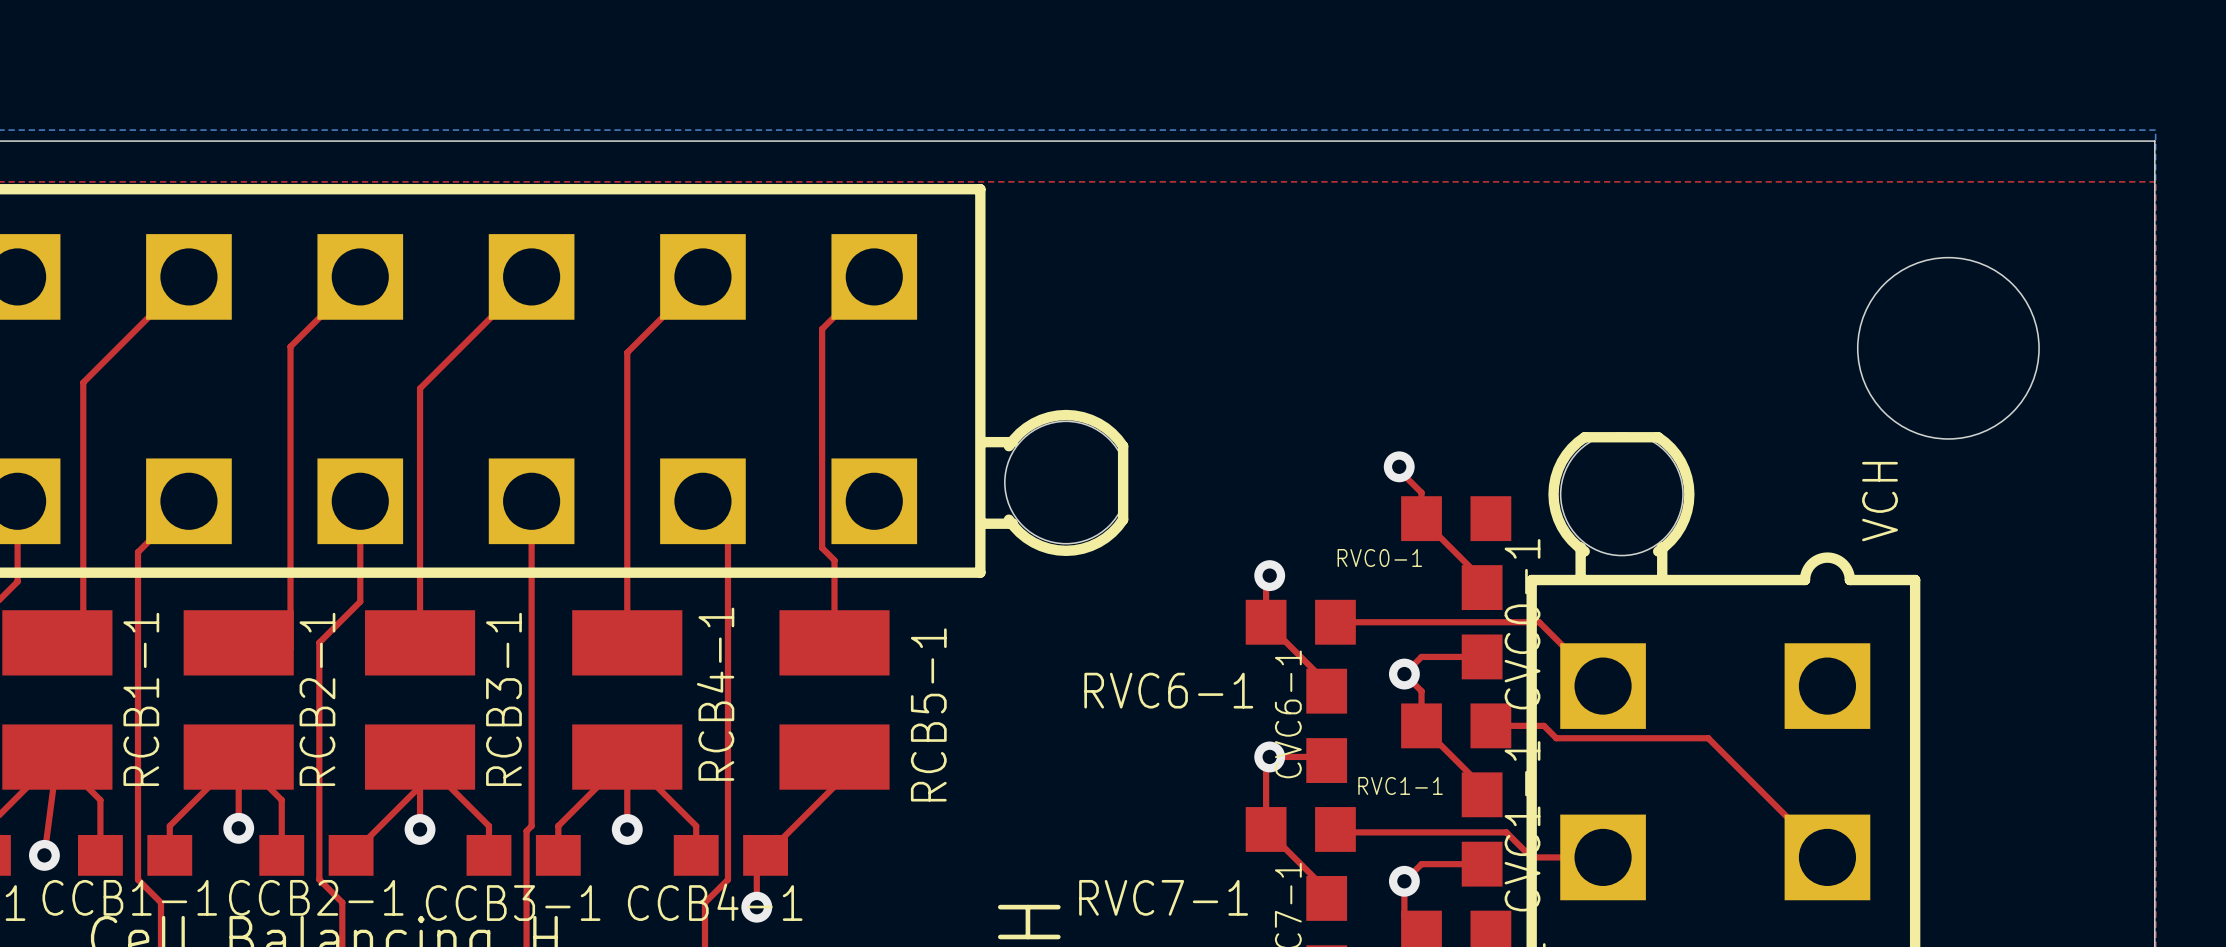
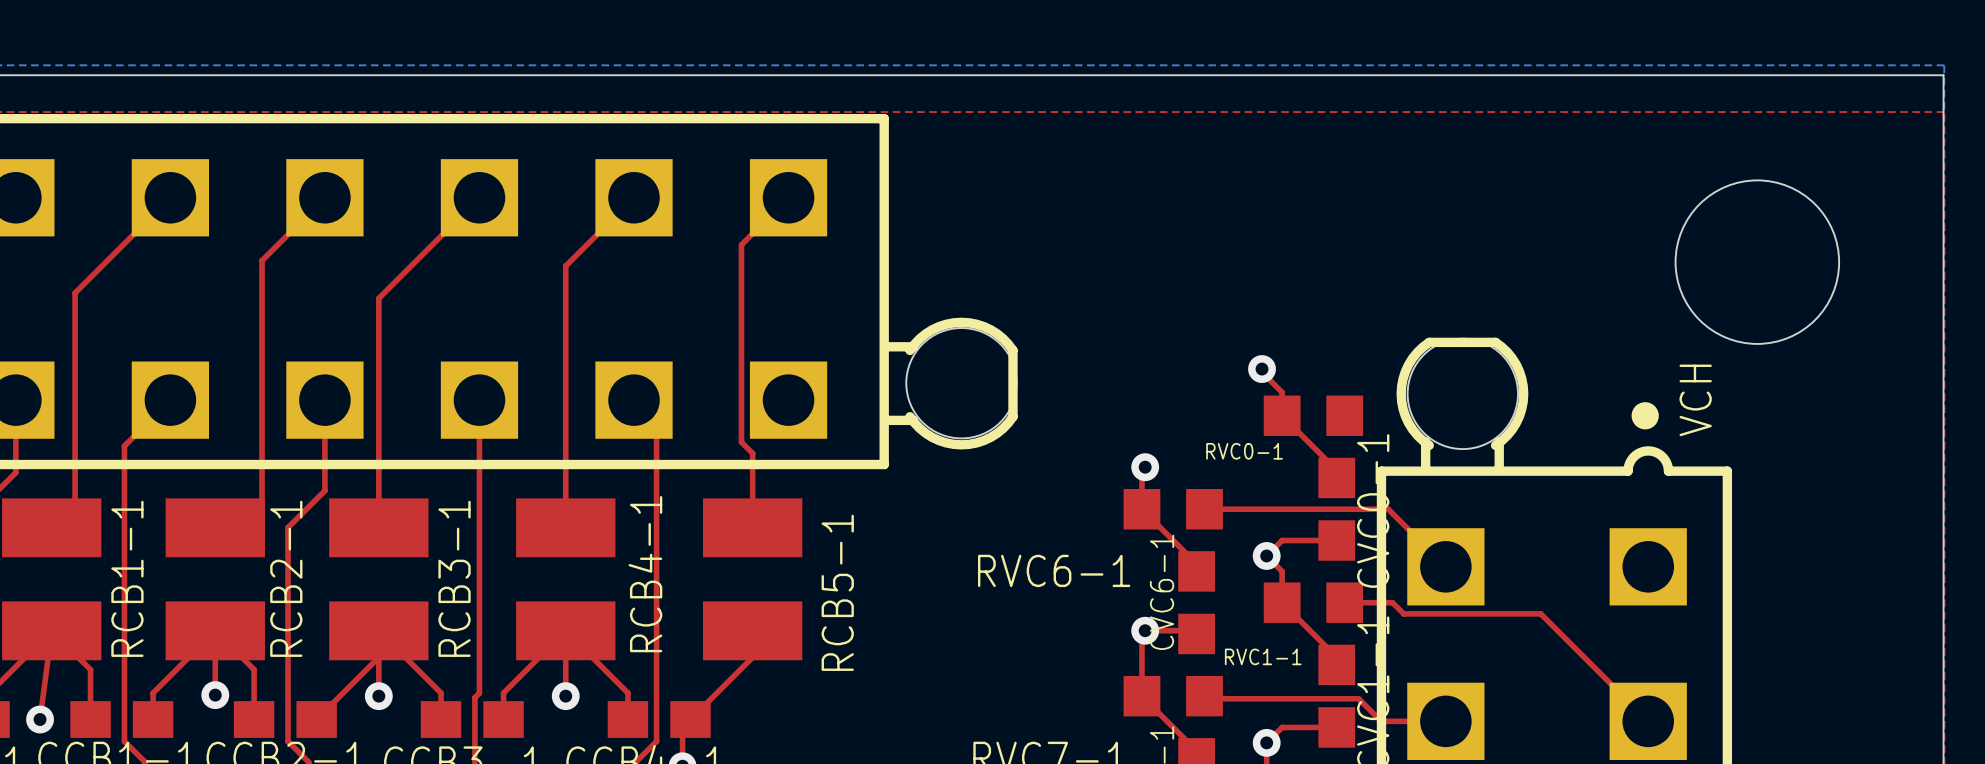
drawing: none -> [1631, 402, 1659, 430]

